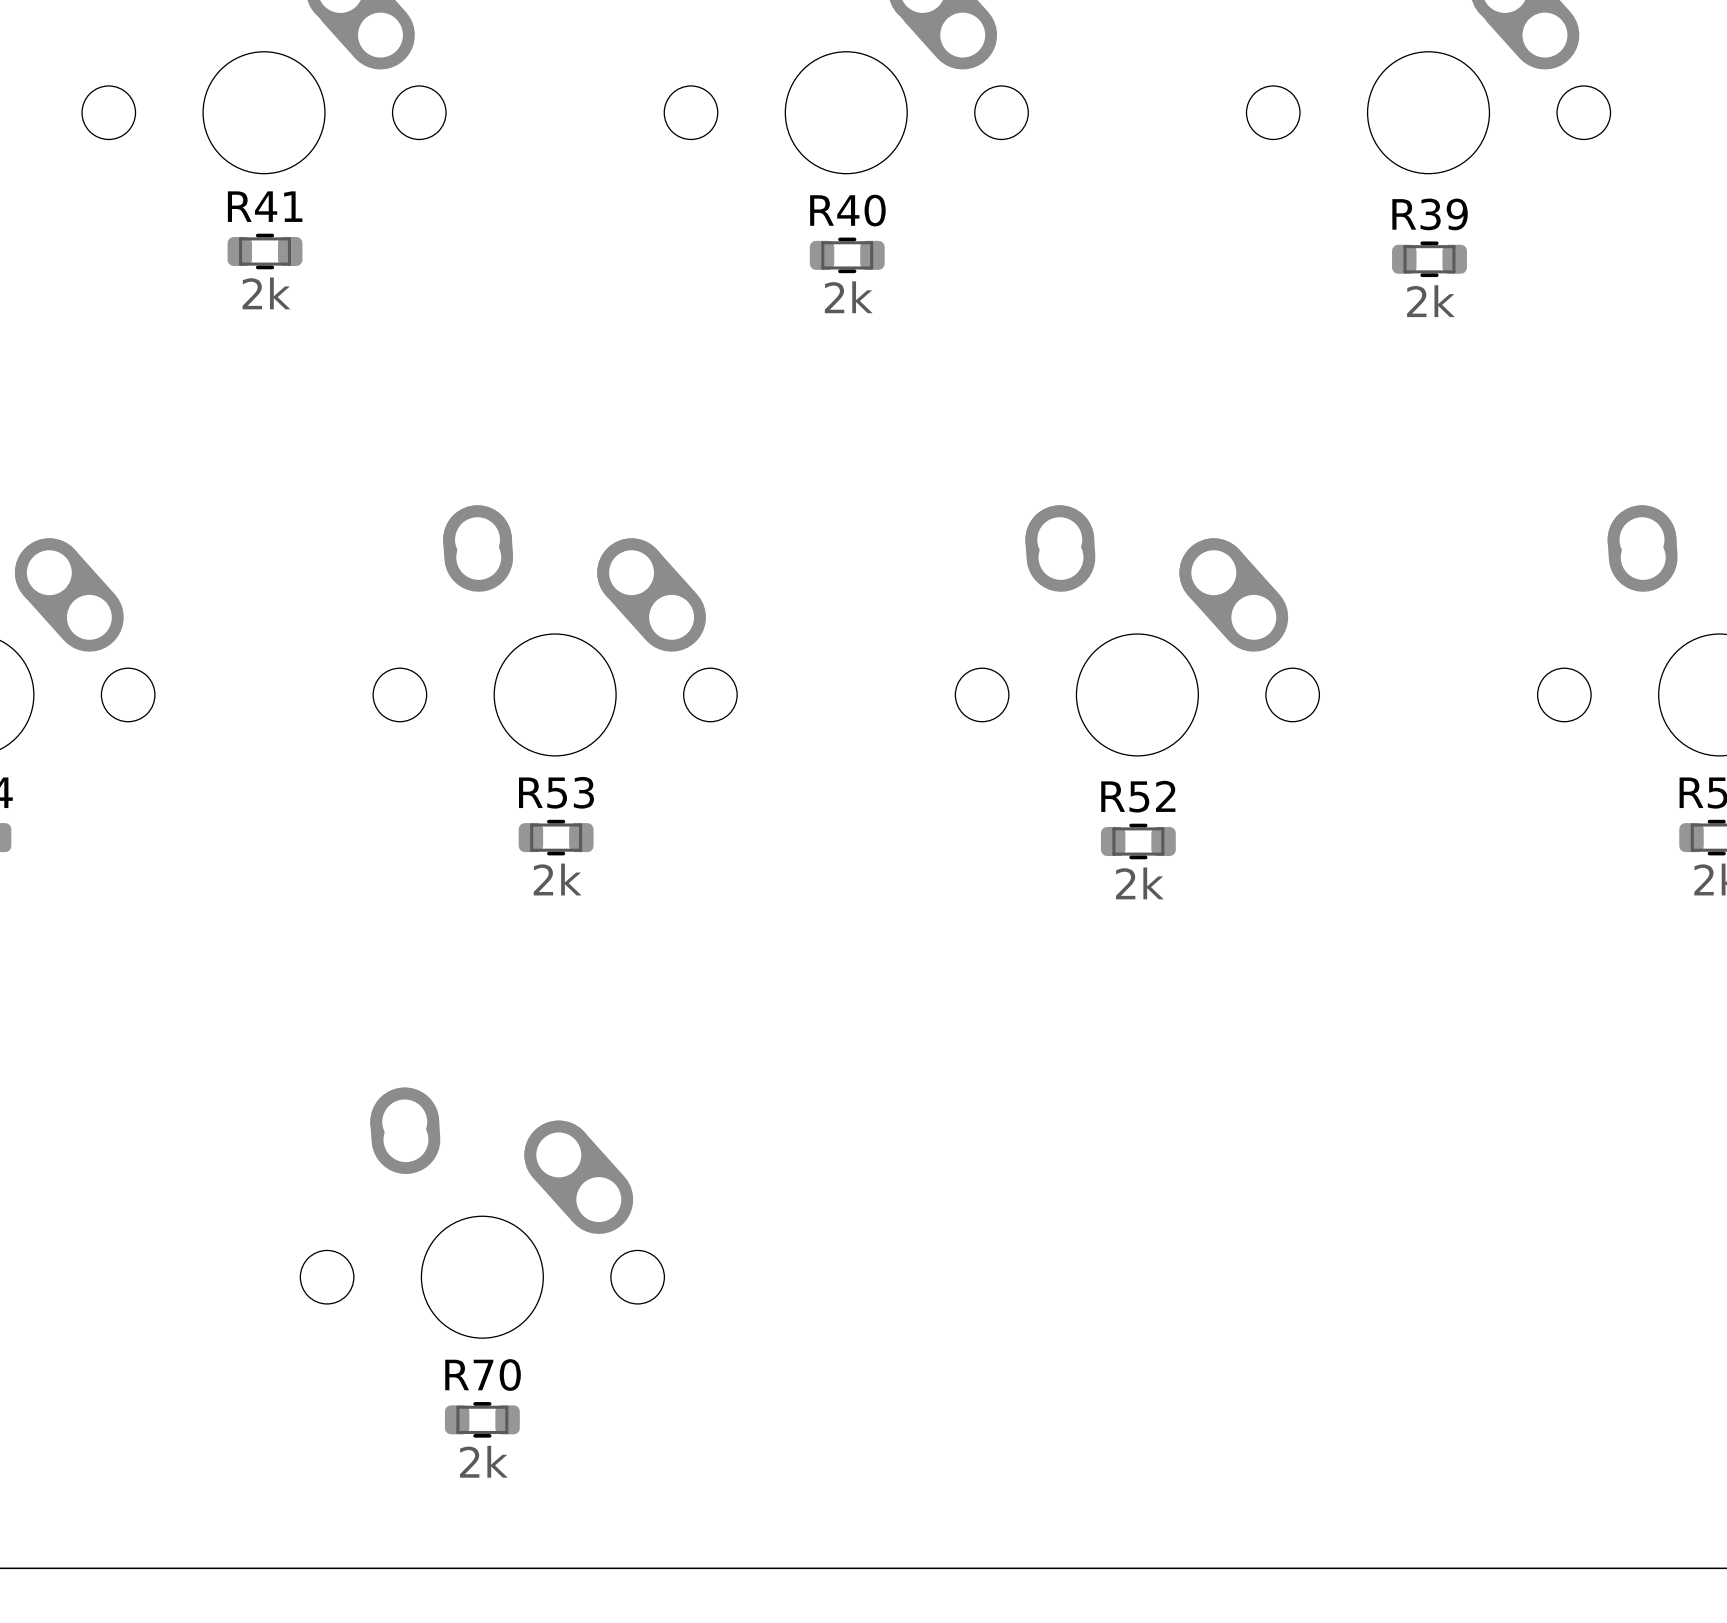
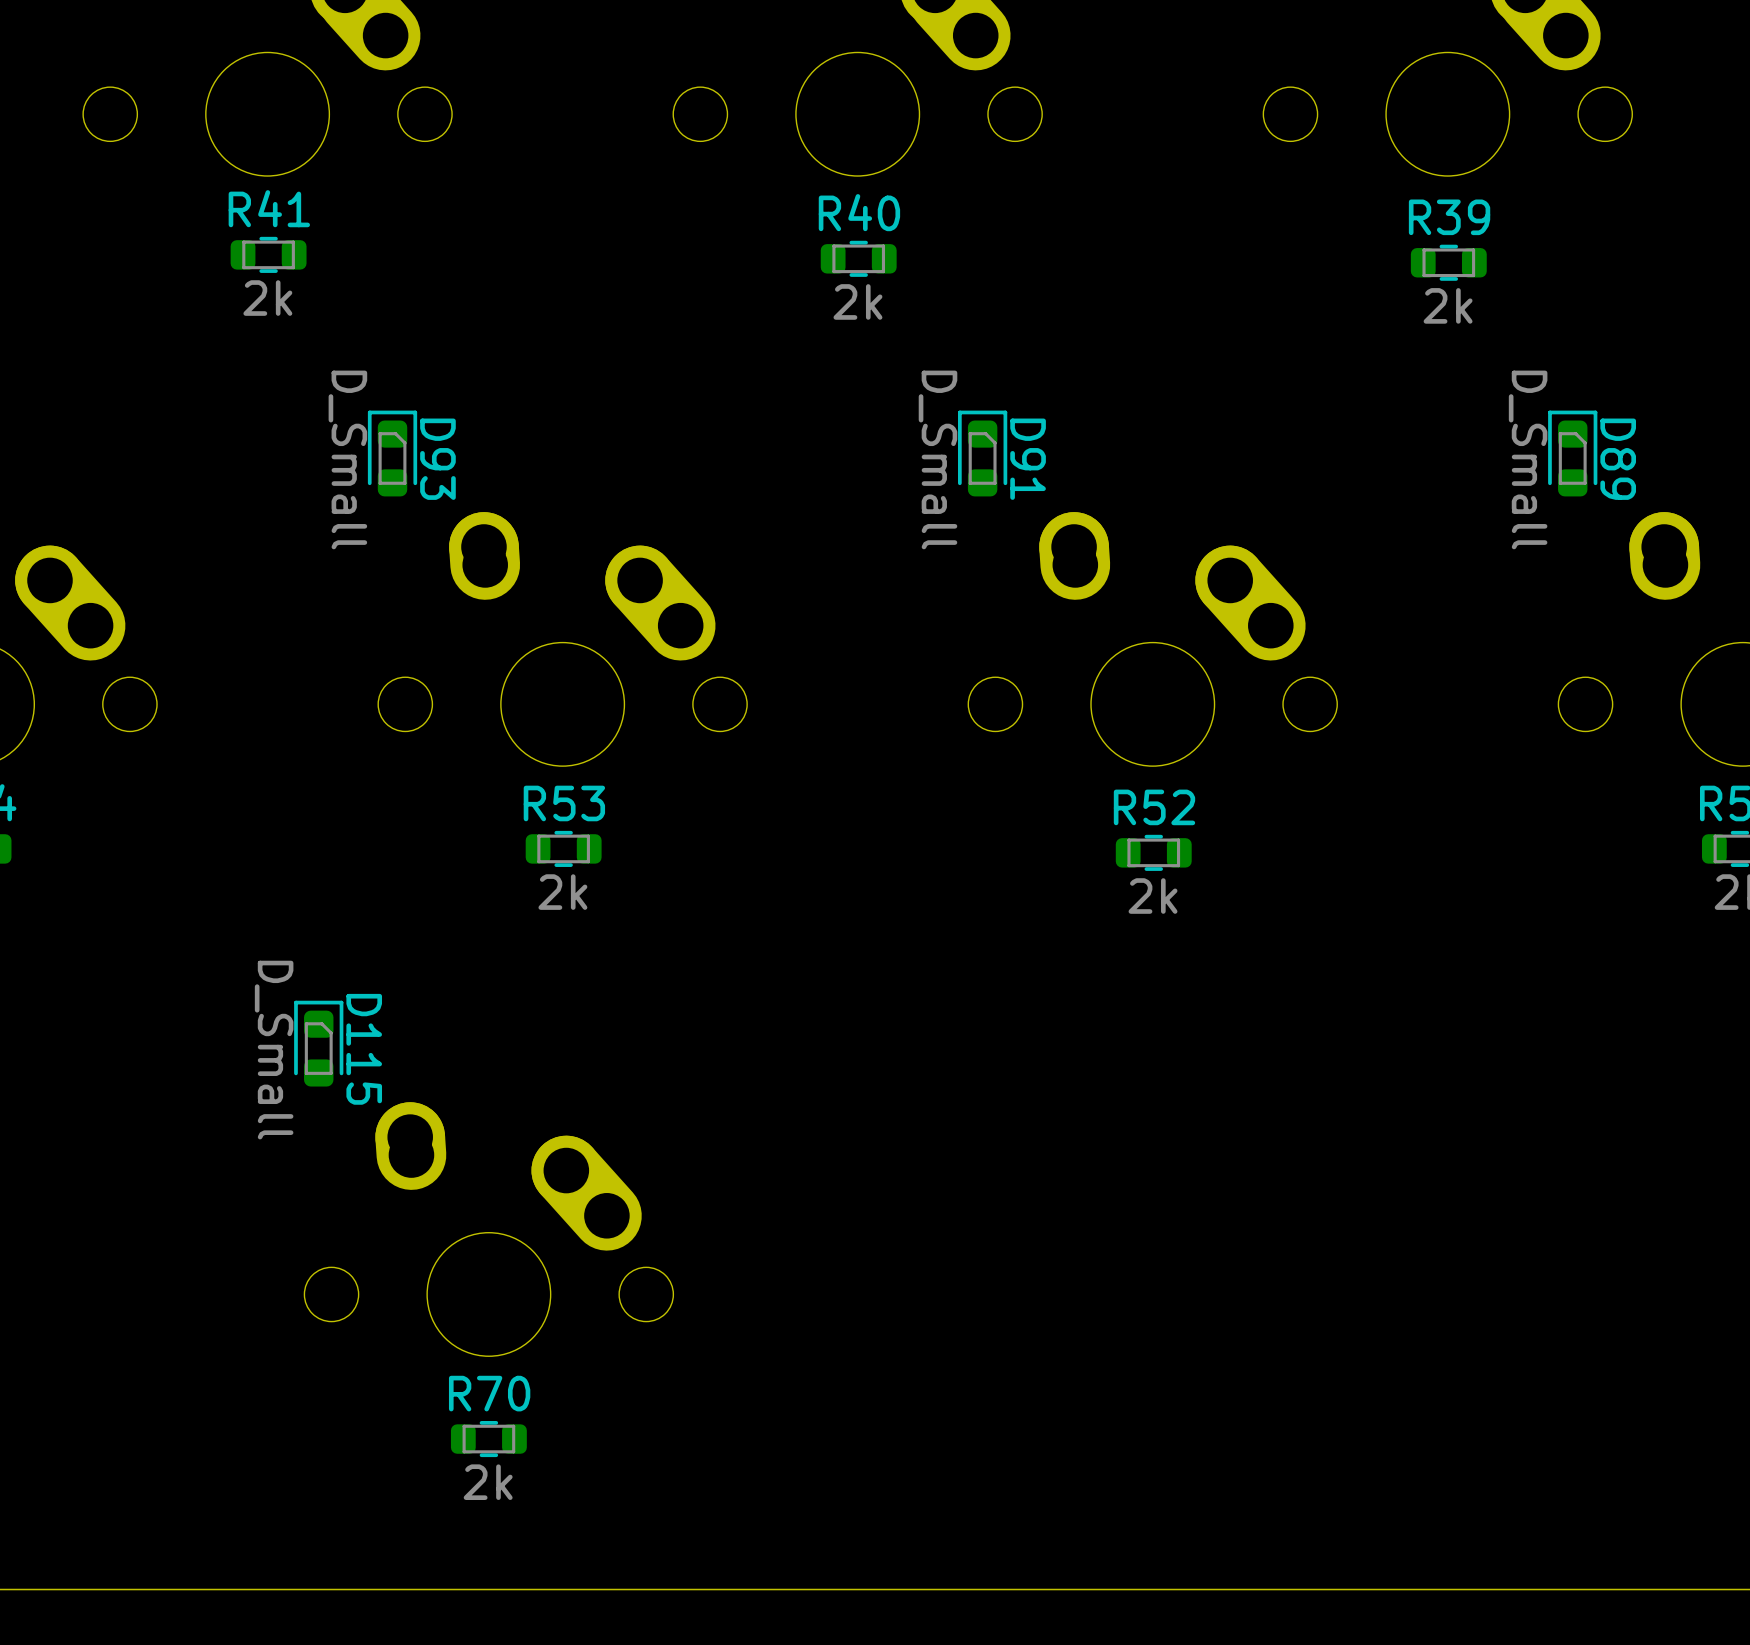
D93: none -> D_Small (392, 453)
D91: none -> D_Small (982, 453)
D89: none -> D_Small (1572, 453)
D115: none -> D_Small (318, 1043)

